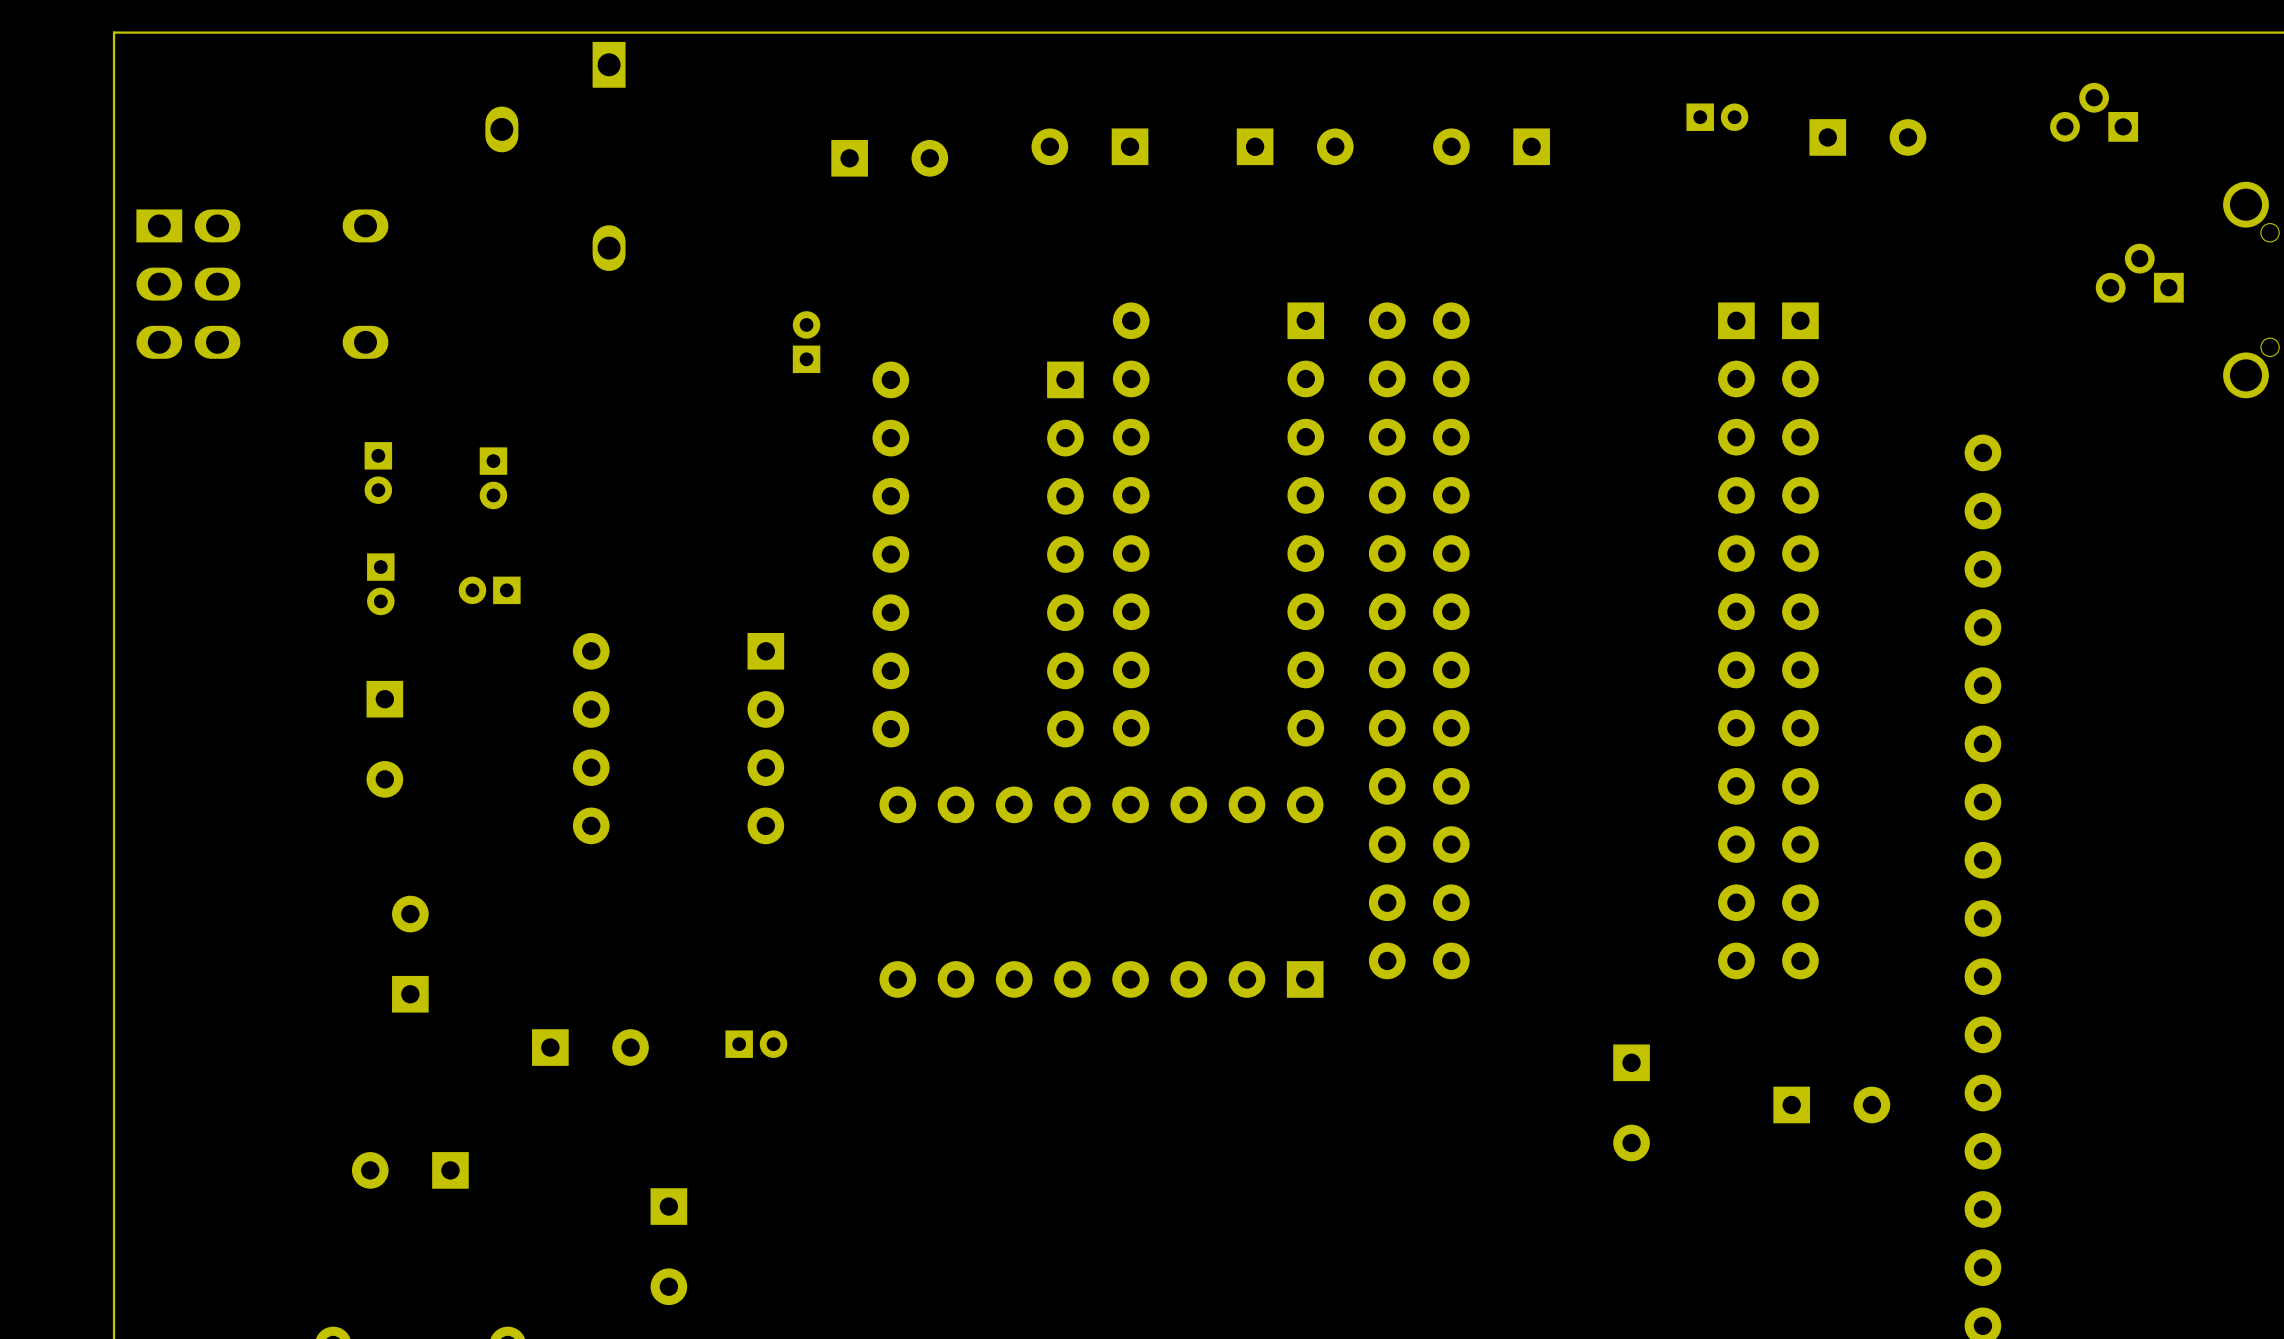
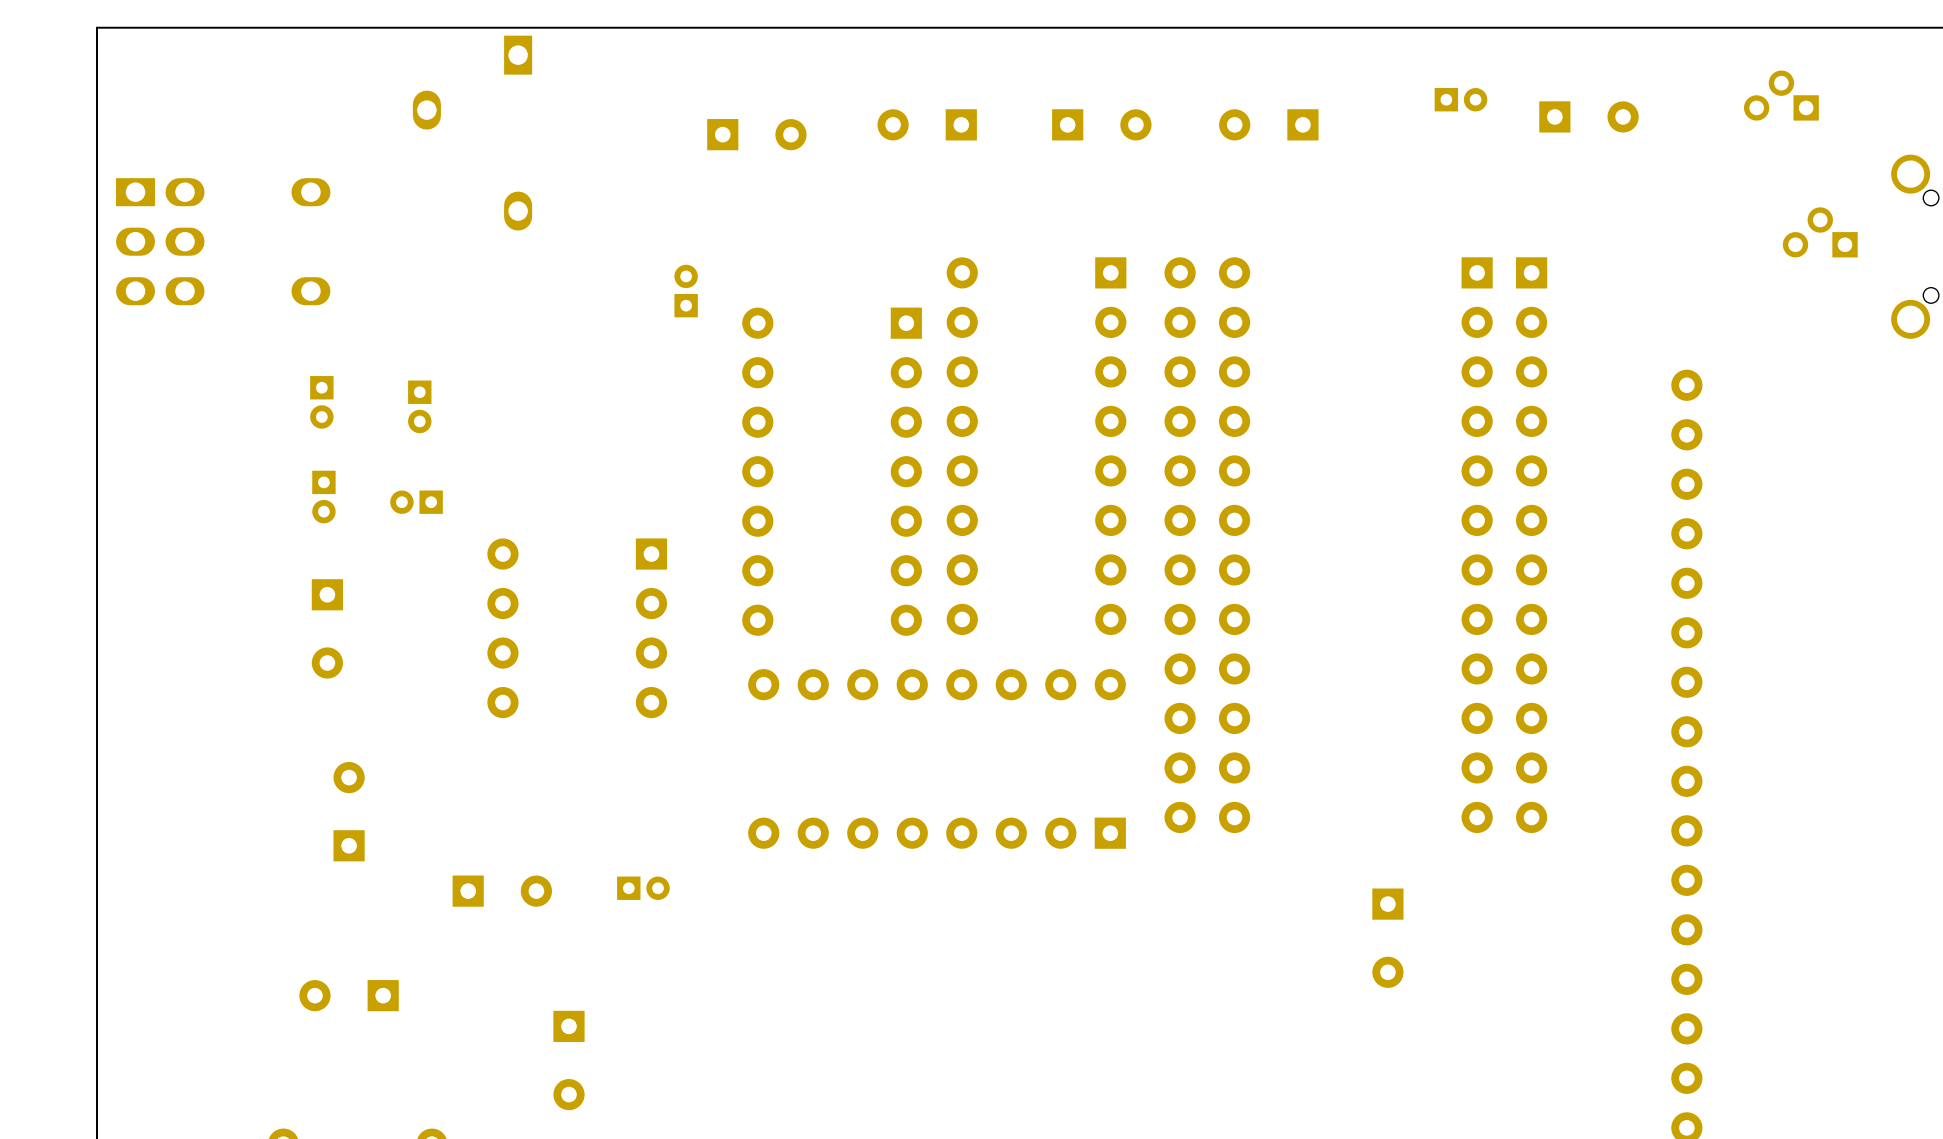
part: (1831, 1104) -> none

